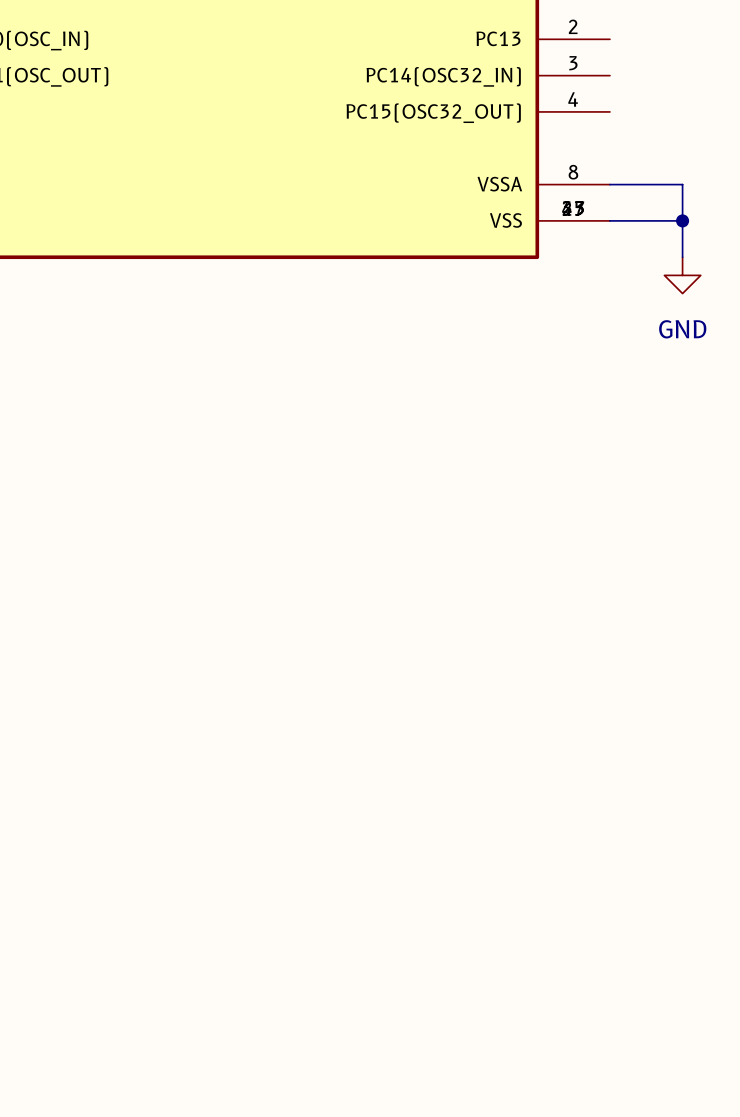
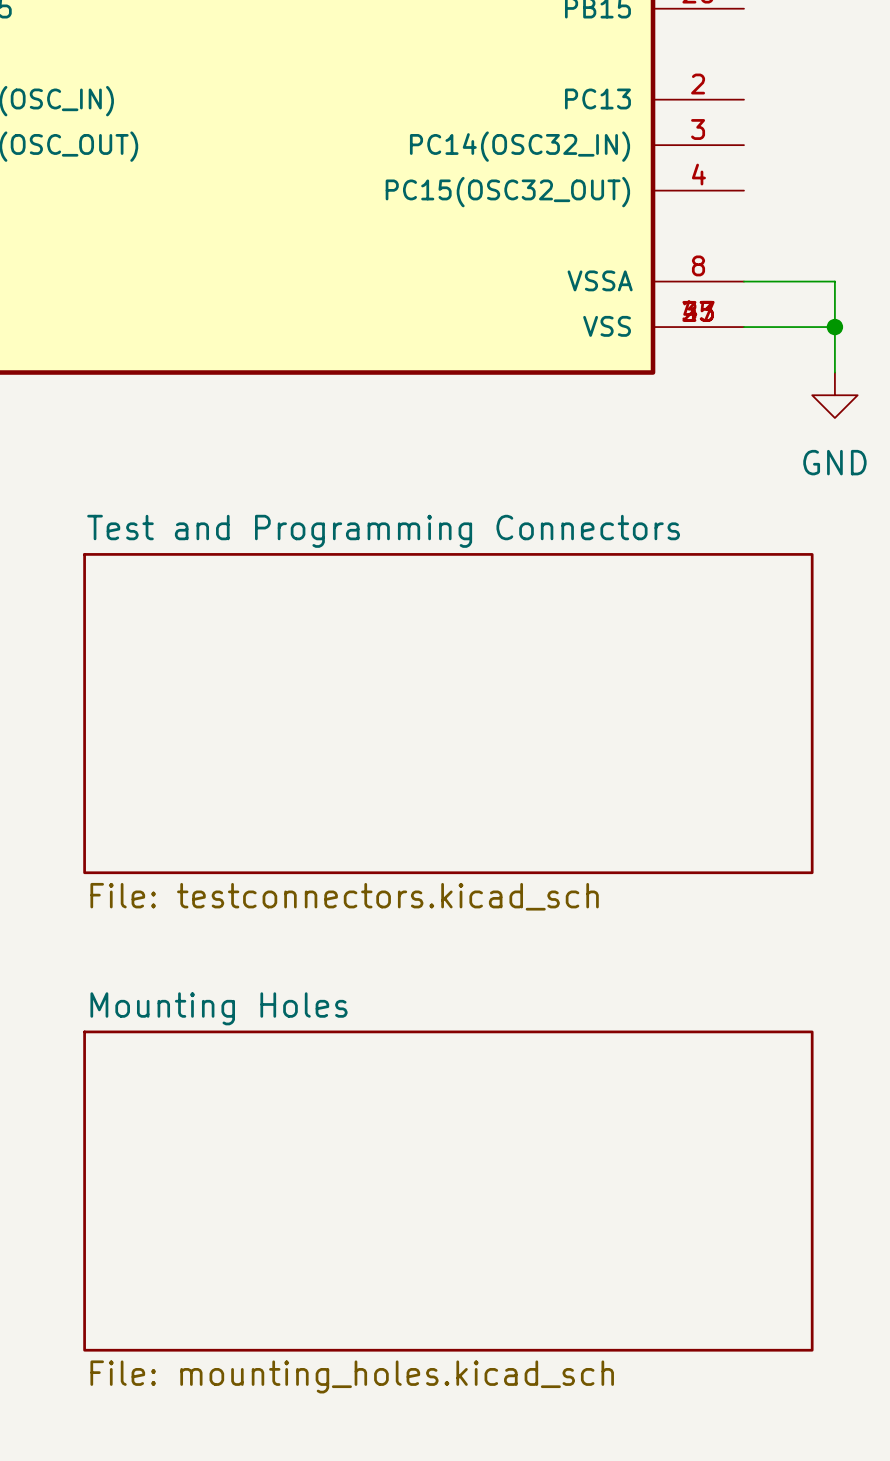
sheet Test and Programming Connectors: none -> File: testconnectors.kicad_sch (448, 713)
sheet Mounting Holes: none -> File: mounting_holes.kicad_sch (448, 1191)

